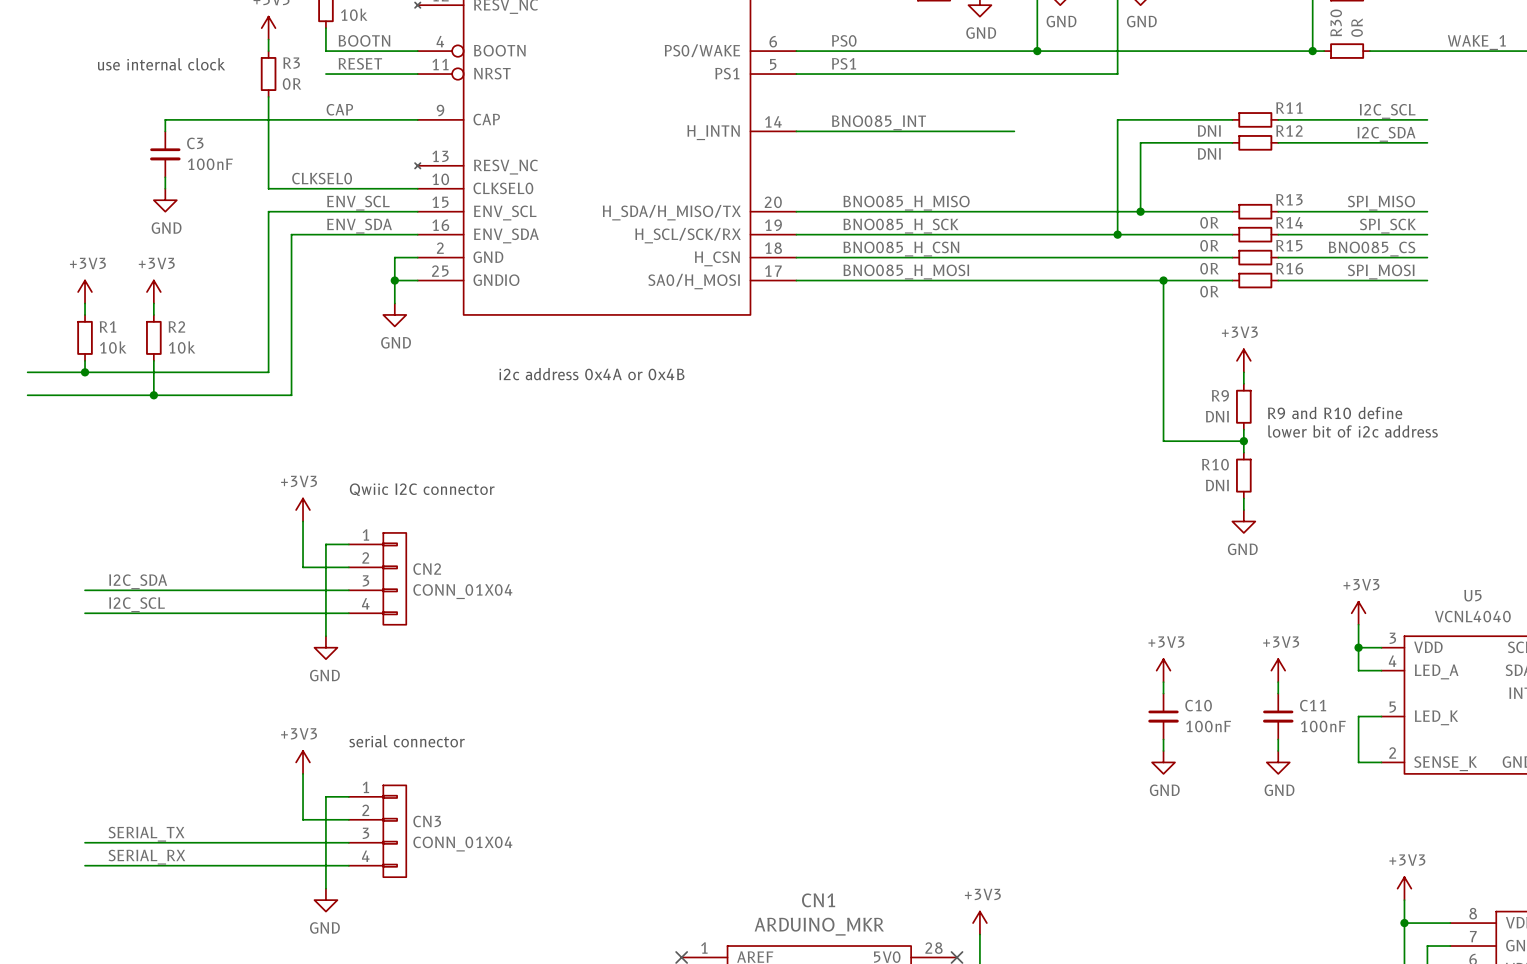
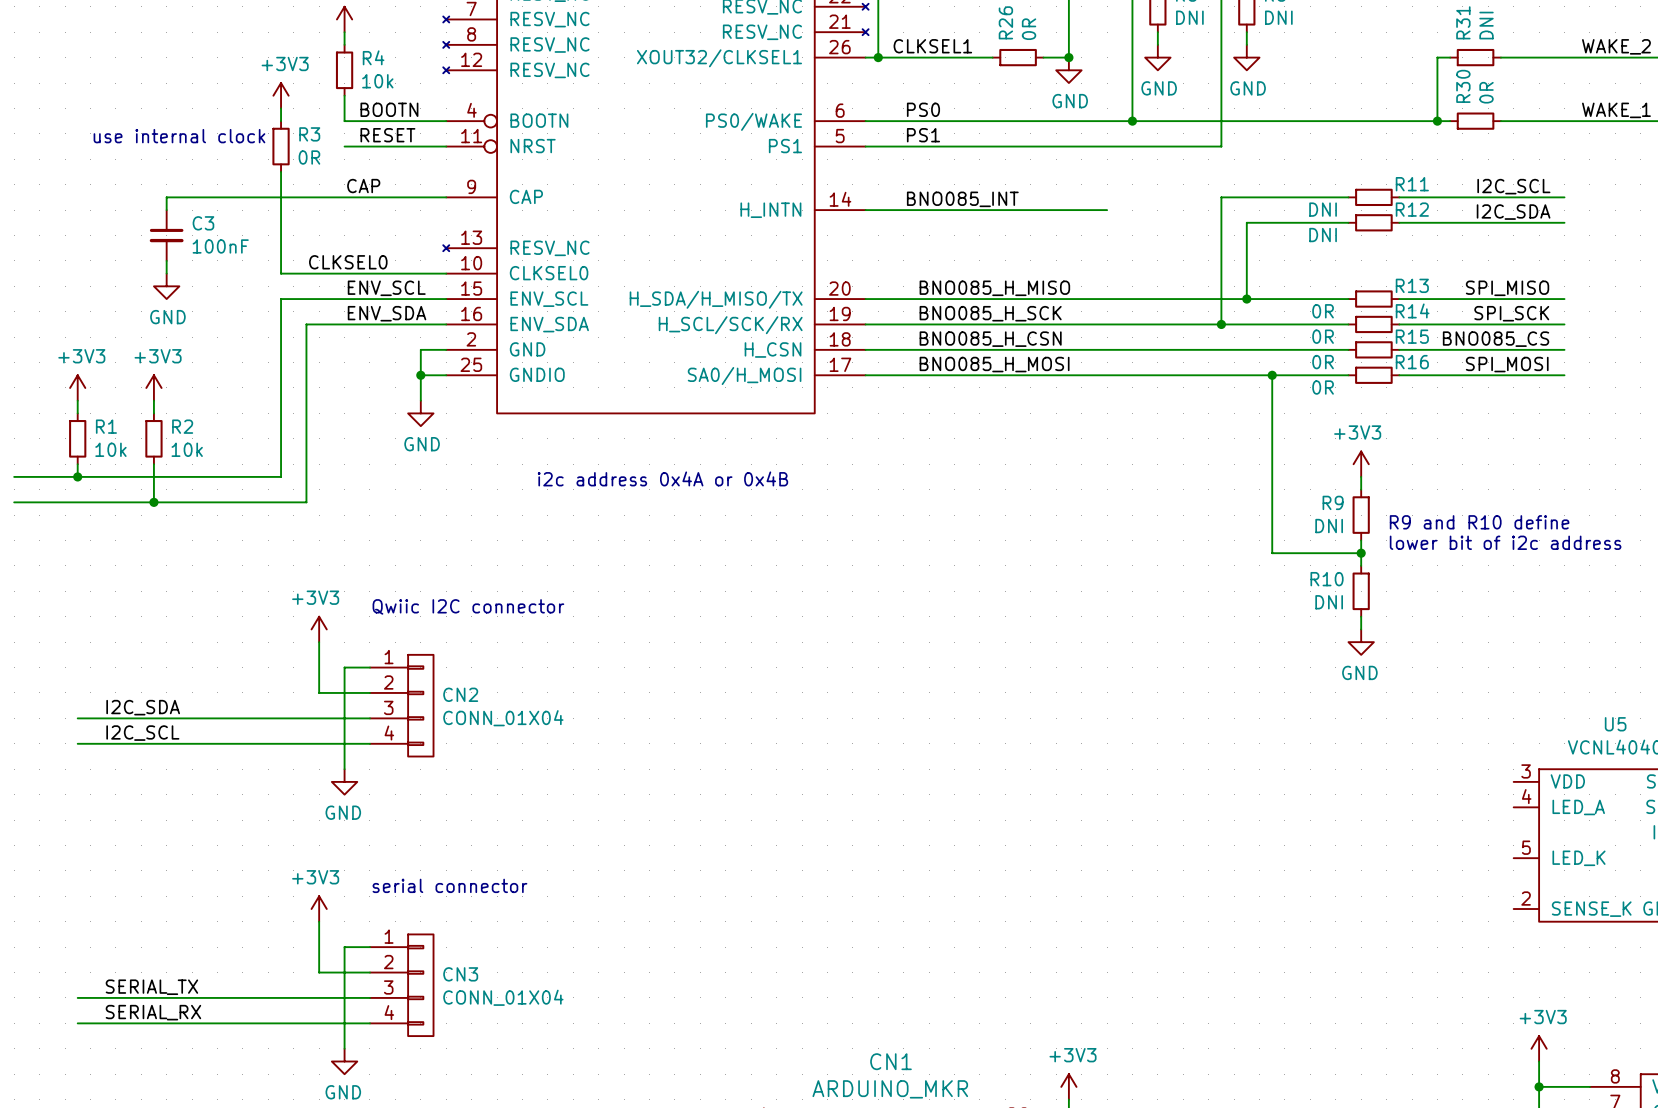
power symbol: +3V3 (1358, 613) -> none
wire: (1358, 624) (1358, 670) (1381, 670) -> none
wire: (1358, 647) (1381, 647) -> none
junction: (1358, 647) -> none
power symbol: +3V3 (1163, 670) -> none
power symbol: +3V3 (1278, 670) -> none
wire: (1163, 682) (1163, 693) -> none
wire: (1278, 682) (1278, 693) -> none
C10: 100nF (1163, 716) -> none
C11: 100nF (1278, 716) -> none
wire: (1381, 716) (1358, 716) (1358, 762) (1381, 762) -> none
wire: (1163, 739) (1163, 750) -> none
wire: (1278, 739) (1278, 750) -> none
power symbol: GND (1163, 762) -> none
power symbol: GND (1278, 762) -> none

